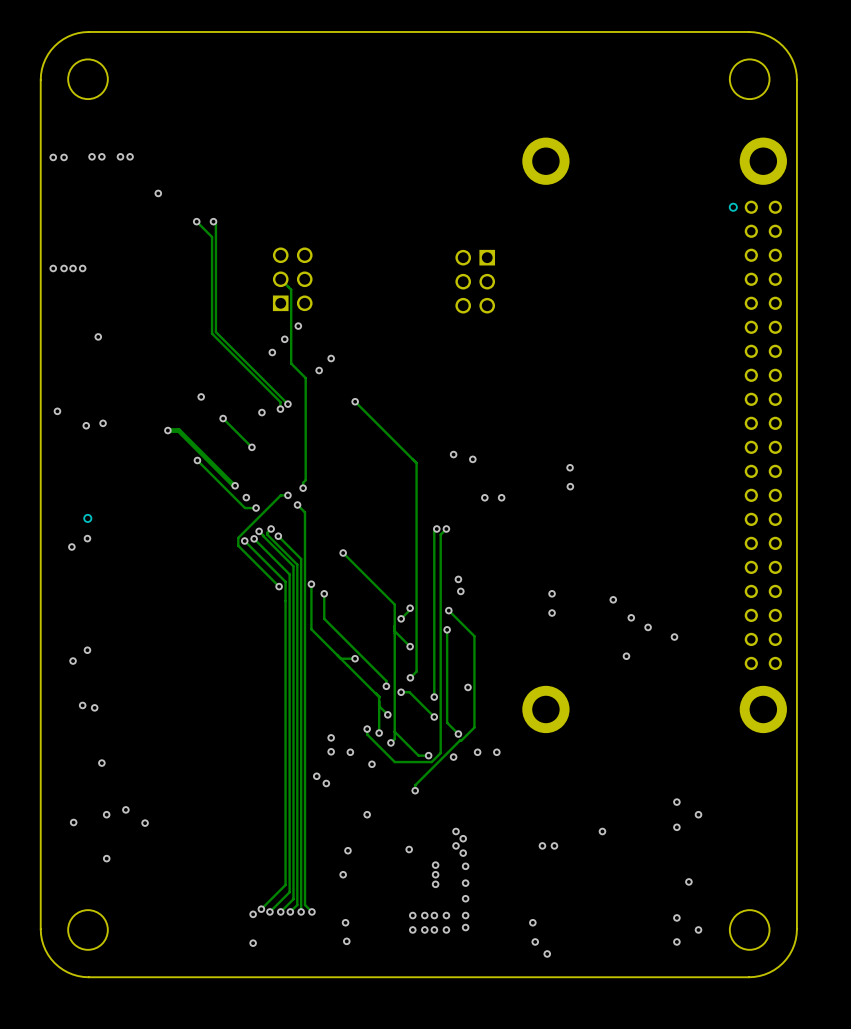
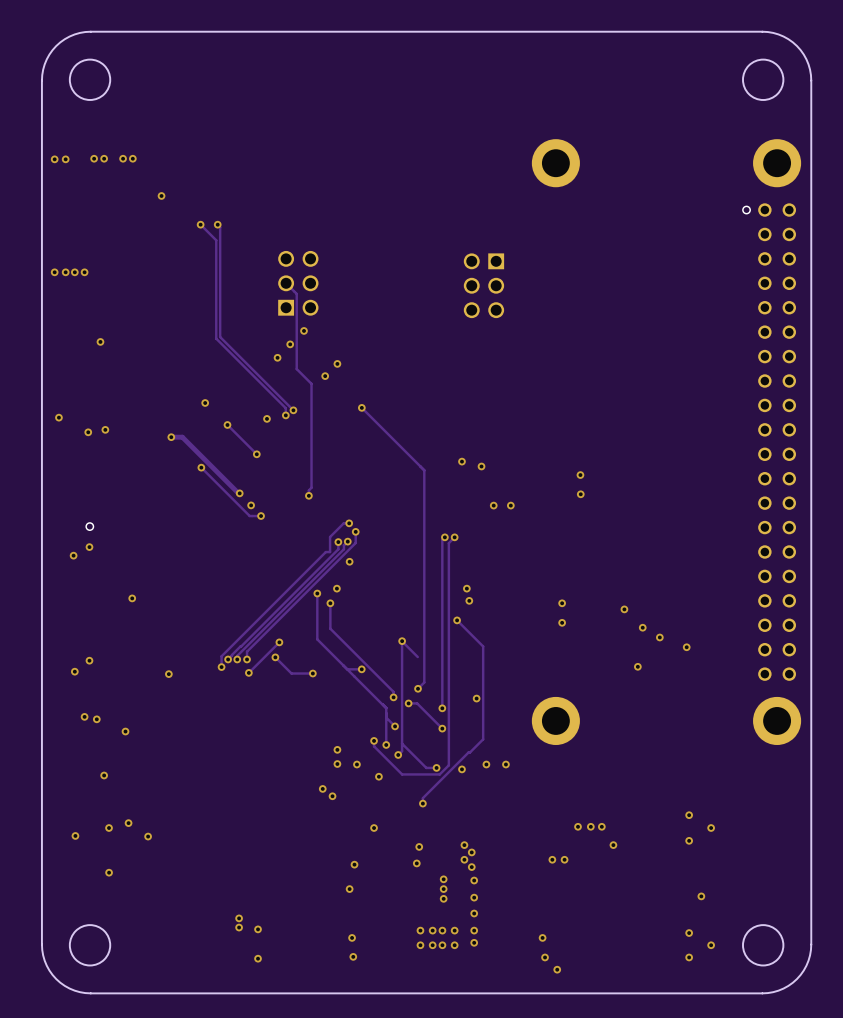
track: (287, 495) (280, 495) (238, 537) (238, 545) (279, 586) -> none
via: (287, 495) -> none
track: (297, 504) (304, 512) (304, 904) (311, 911) -> none
via: (297, 504) -> none
track: none -> (349, 523) (343, 523) (330, 537) (330, 552) (325, 552) (221, 656) (221, 667)
via: none -> (349, 523)
track: none -> (355, 531) (355, 542) (247, 651) (247, 659)
via: none -> (355, 531)
track: (271, 528) (267, 534) (297, 564) (297, 904) (290, 911) -> none
via: (271, 528) -> none
track: (259, 531) (293, 566) (293, 899) (280, 911) -> none
via: (259, 531) -> none
track: none -> (338, 542) (338, 549) (228, 659)
via: none -> (338, 542)
track: none -> (347, 541) (343, 545) (343, 549) (237, 655) (237, 659)
via: none -> (347, 541)
track: (278, 536) (301, 559) (301, 911) -> none
via: (278, 536) -> none
track: (254, 538) (289, 574) (289, 892) (269, 911) -> none
via: (254, 538) -> none
track: (244, 540) (285, 581) (285, 885) (261, 909) -> none
via: (244, 540) -> none
track: (343, 552) (394, 604) (394, 633) -> none
via: none -> (336, 588)
via: (279, 586) -> none
via: none -> (132, 598)
track: (410, 608) (401, 618) -> none
via: (410, 608) -> none
via: (401, 618) -> none
track: (447, 629) (447, 722) (458, 734) -> none
via: (447, 629) -> none
via: none -> (402, 641)
track: none -> (279, 642) (248, 672)
via: none -> (279, 642)
track: none -> (275, 657) (291, 673) (312, 673)
via: none -> (275, 657)
via: (410, 646) -> none
via: none -> (228, 659)
via: none -> (237, 659)
via: none -> (247, 659)
via: none -> (221, 667)
via: none -> (248, 672)
via: none -> (312, 673)
via: none -> (168, 674)
via: none -> (125, 731)
via: (458, 734) -> none
via: none -> (578, 826)
via: none -> (590, 826)
via: none -> (601, 826)
via: none -> (419, 846)
via: none -> (239, 918)
via: (261, 909) -> none
via: (269, 911) -> none
via: (280, 911) -> none
via: (290, 911) -> none
via: (301, 911) -> none
via: (311, 911) -> none
via: none -> (239, 927)

